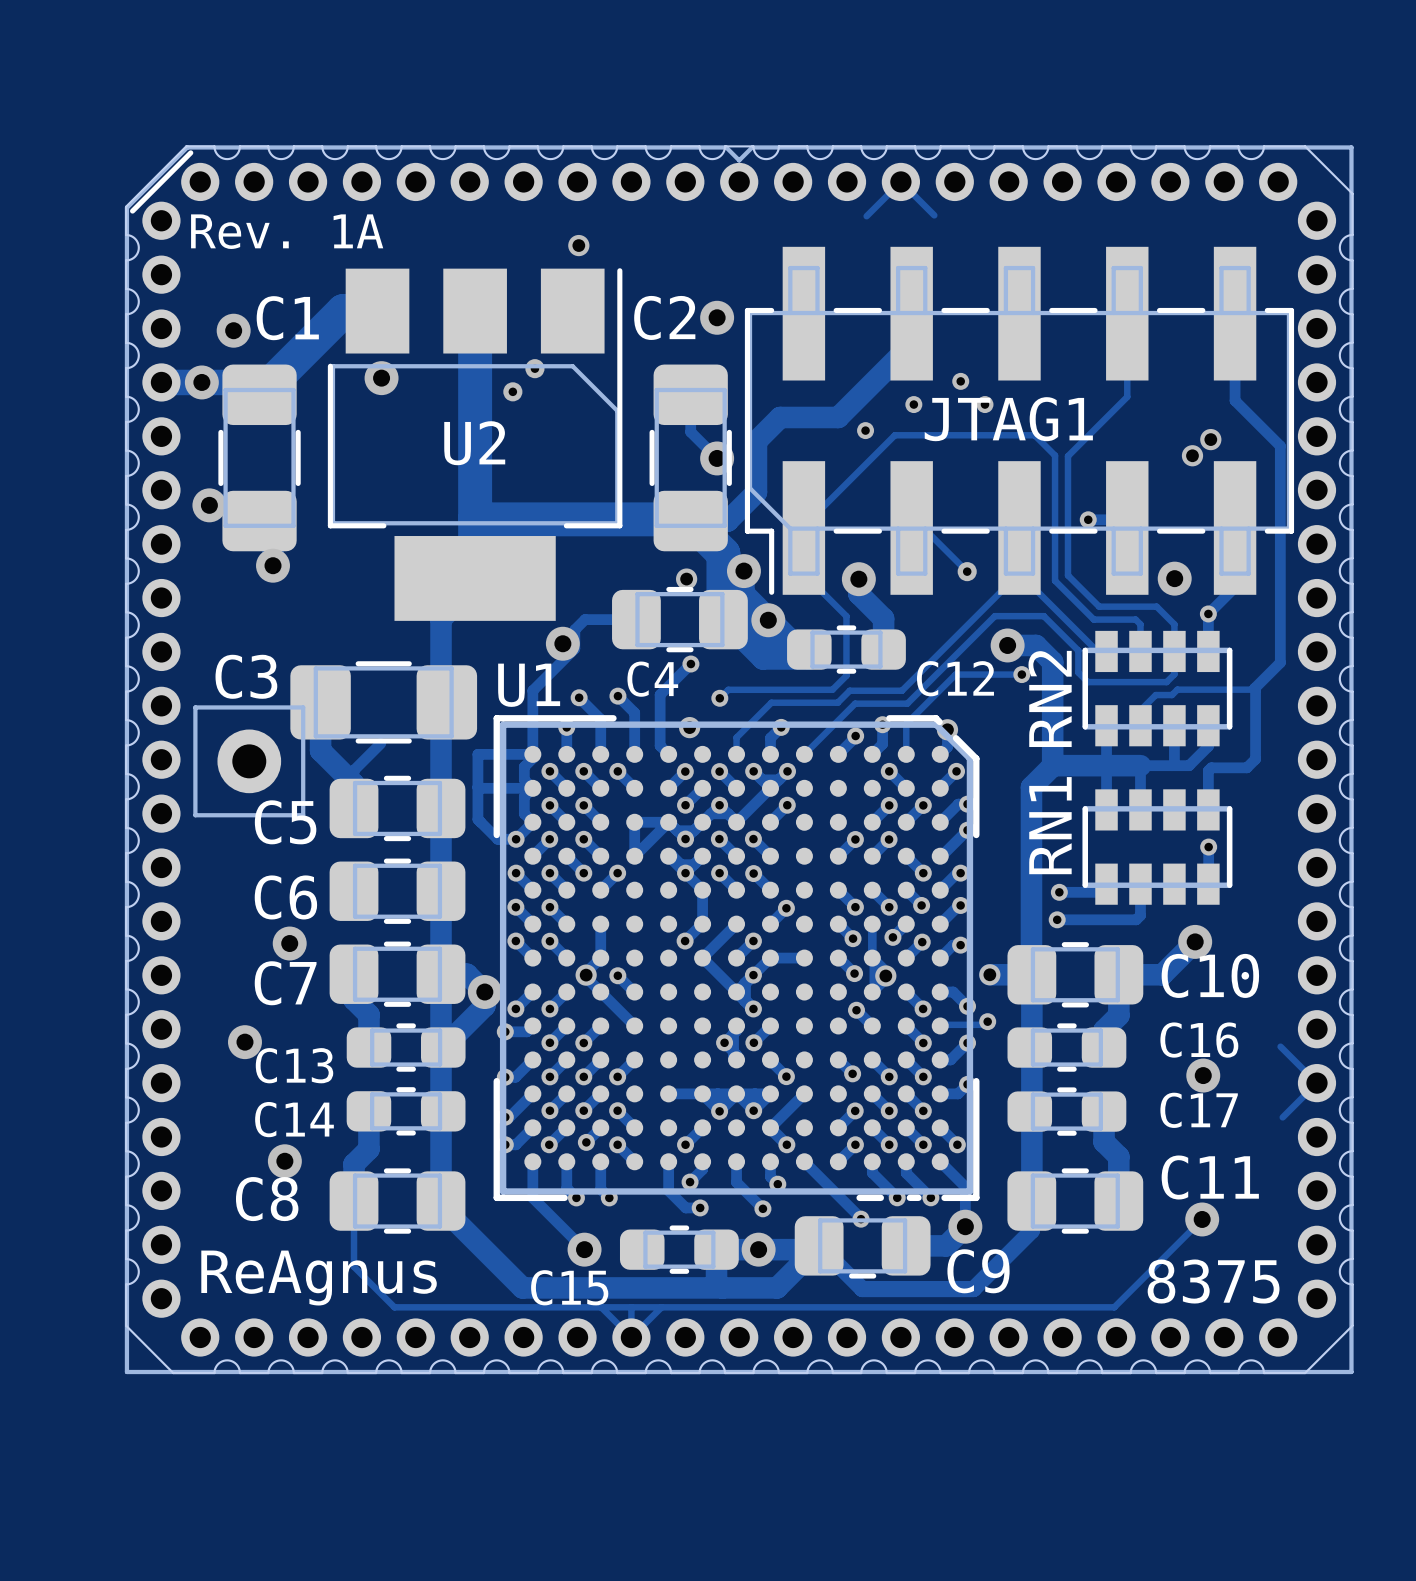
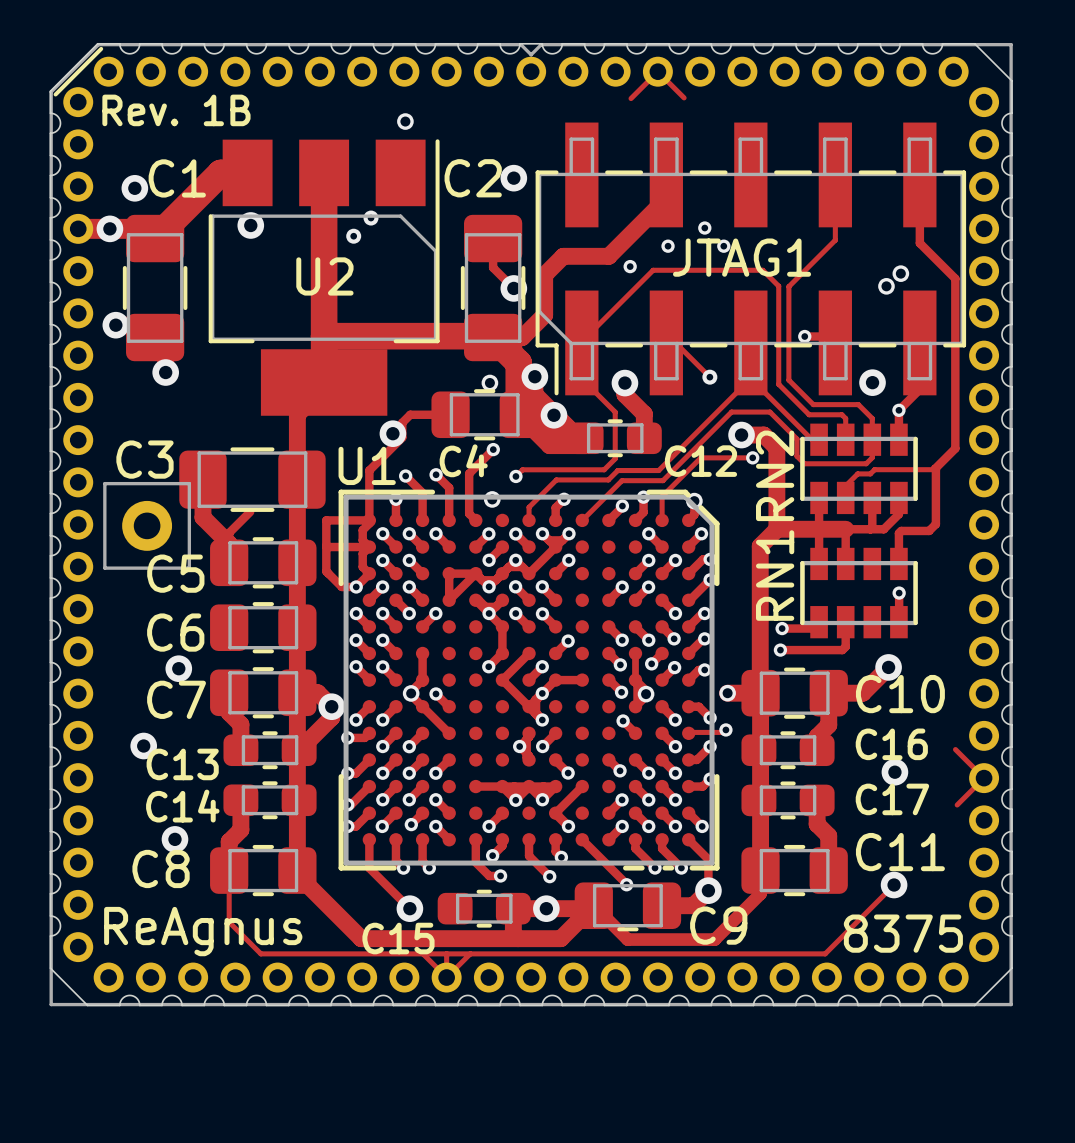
text: Rev. 1A (287, 231) -> Rev. 1B (176, 110)

